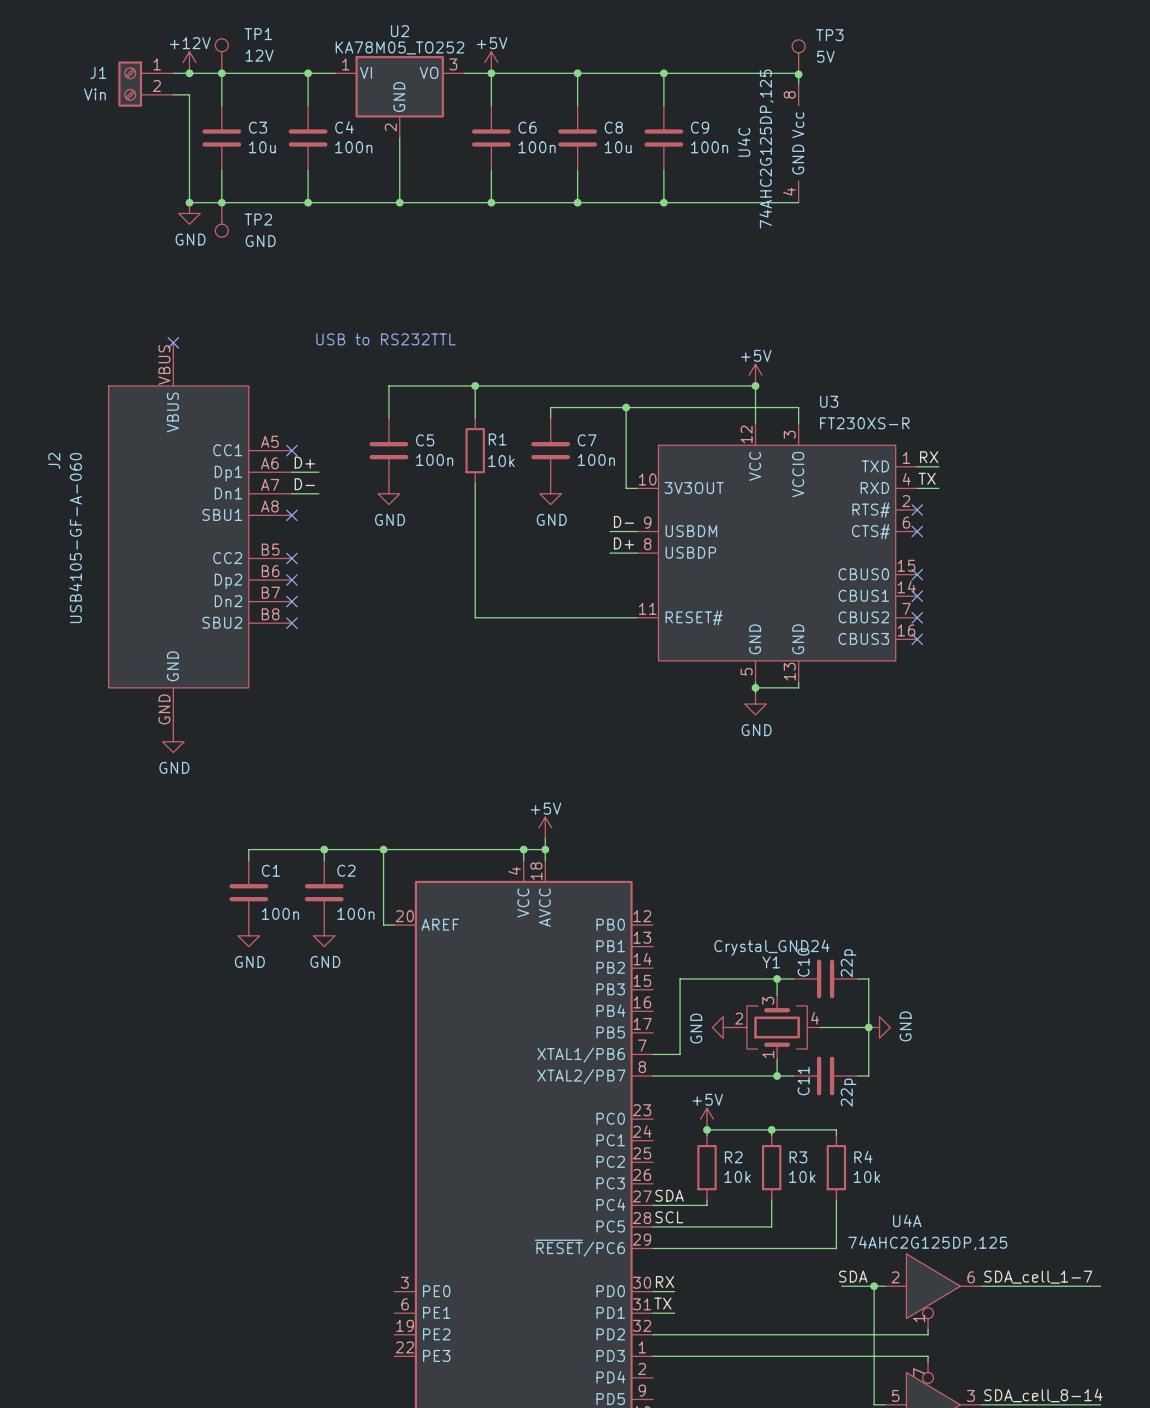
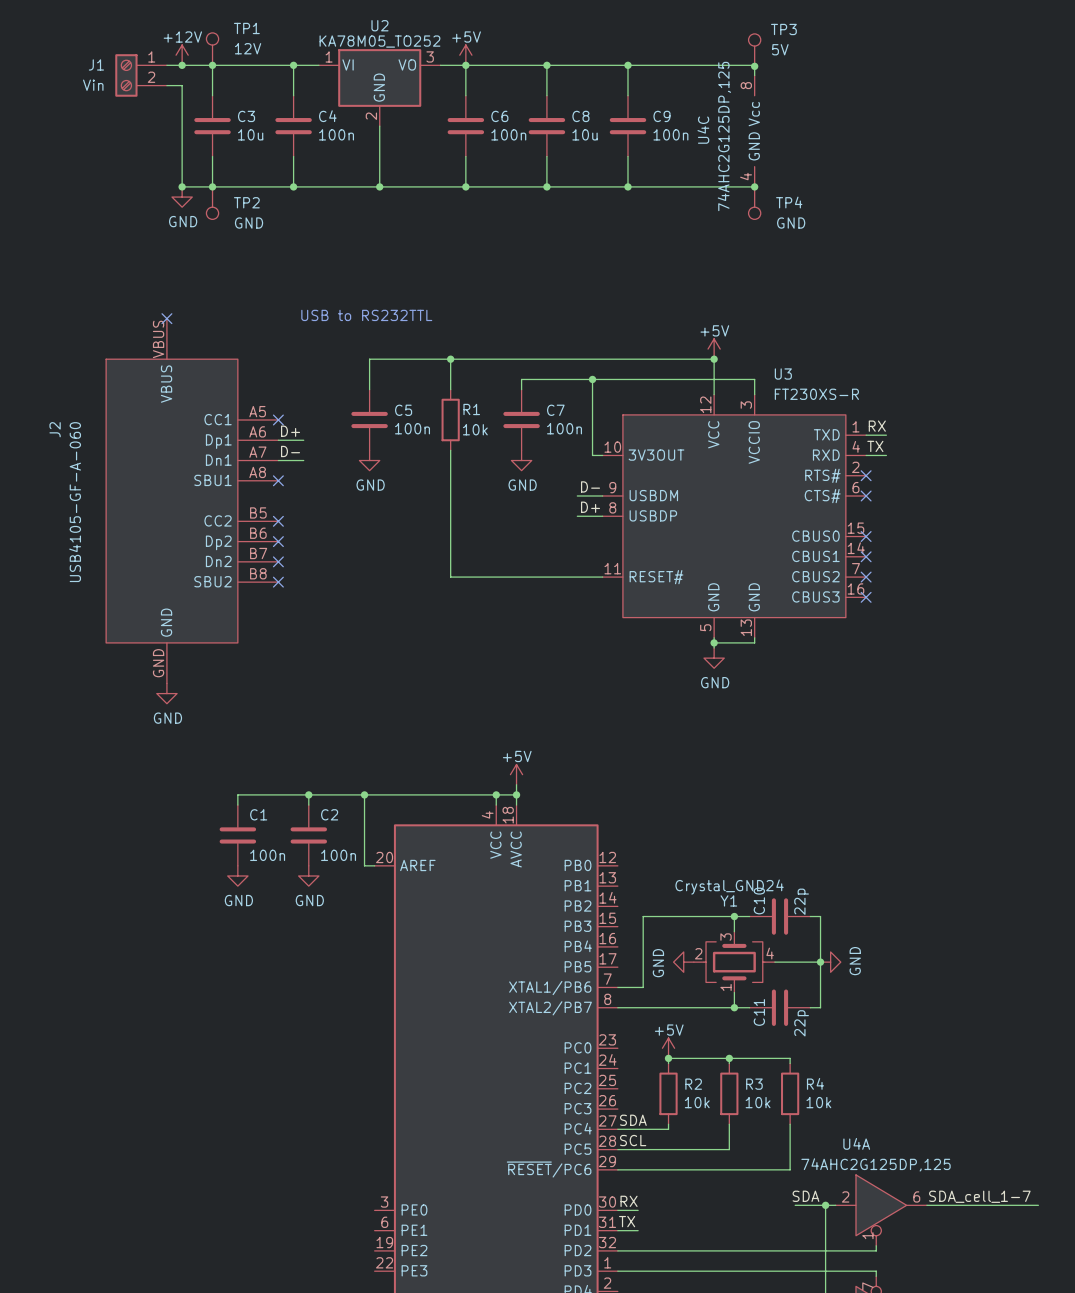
junction: none -> (754, 186)
TP4: none -> GND (754, 203)

